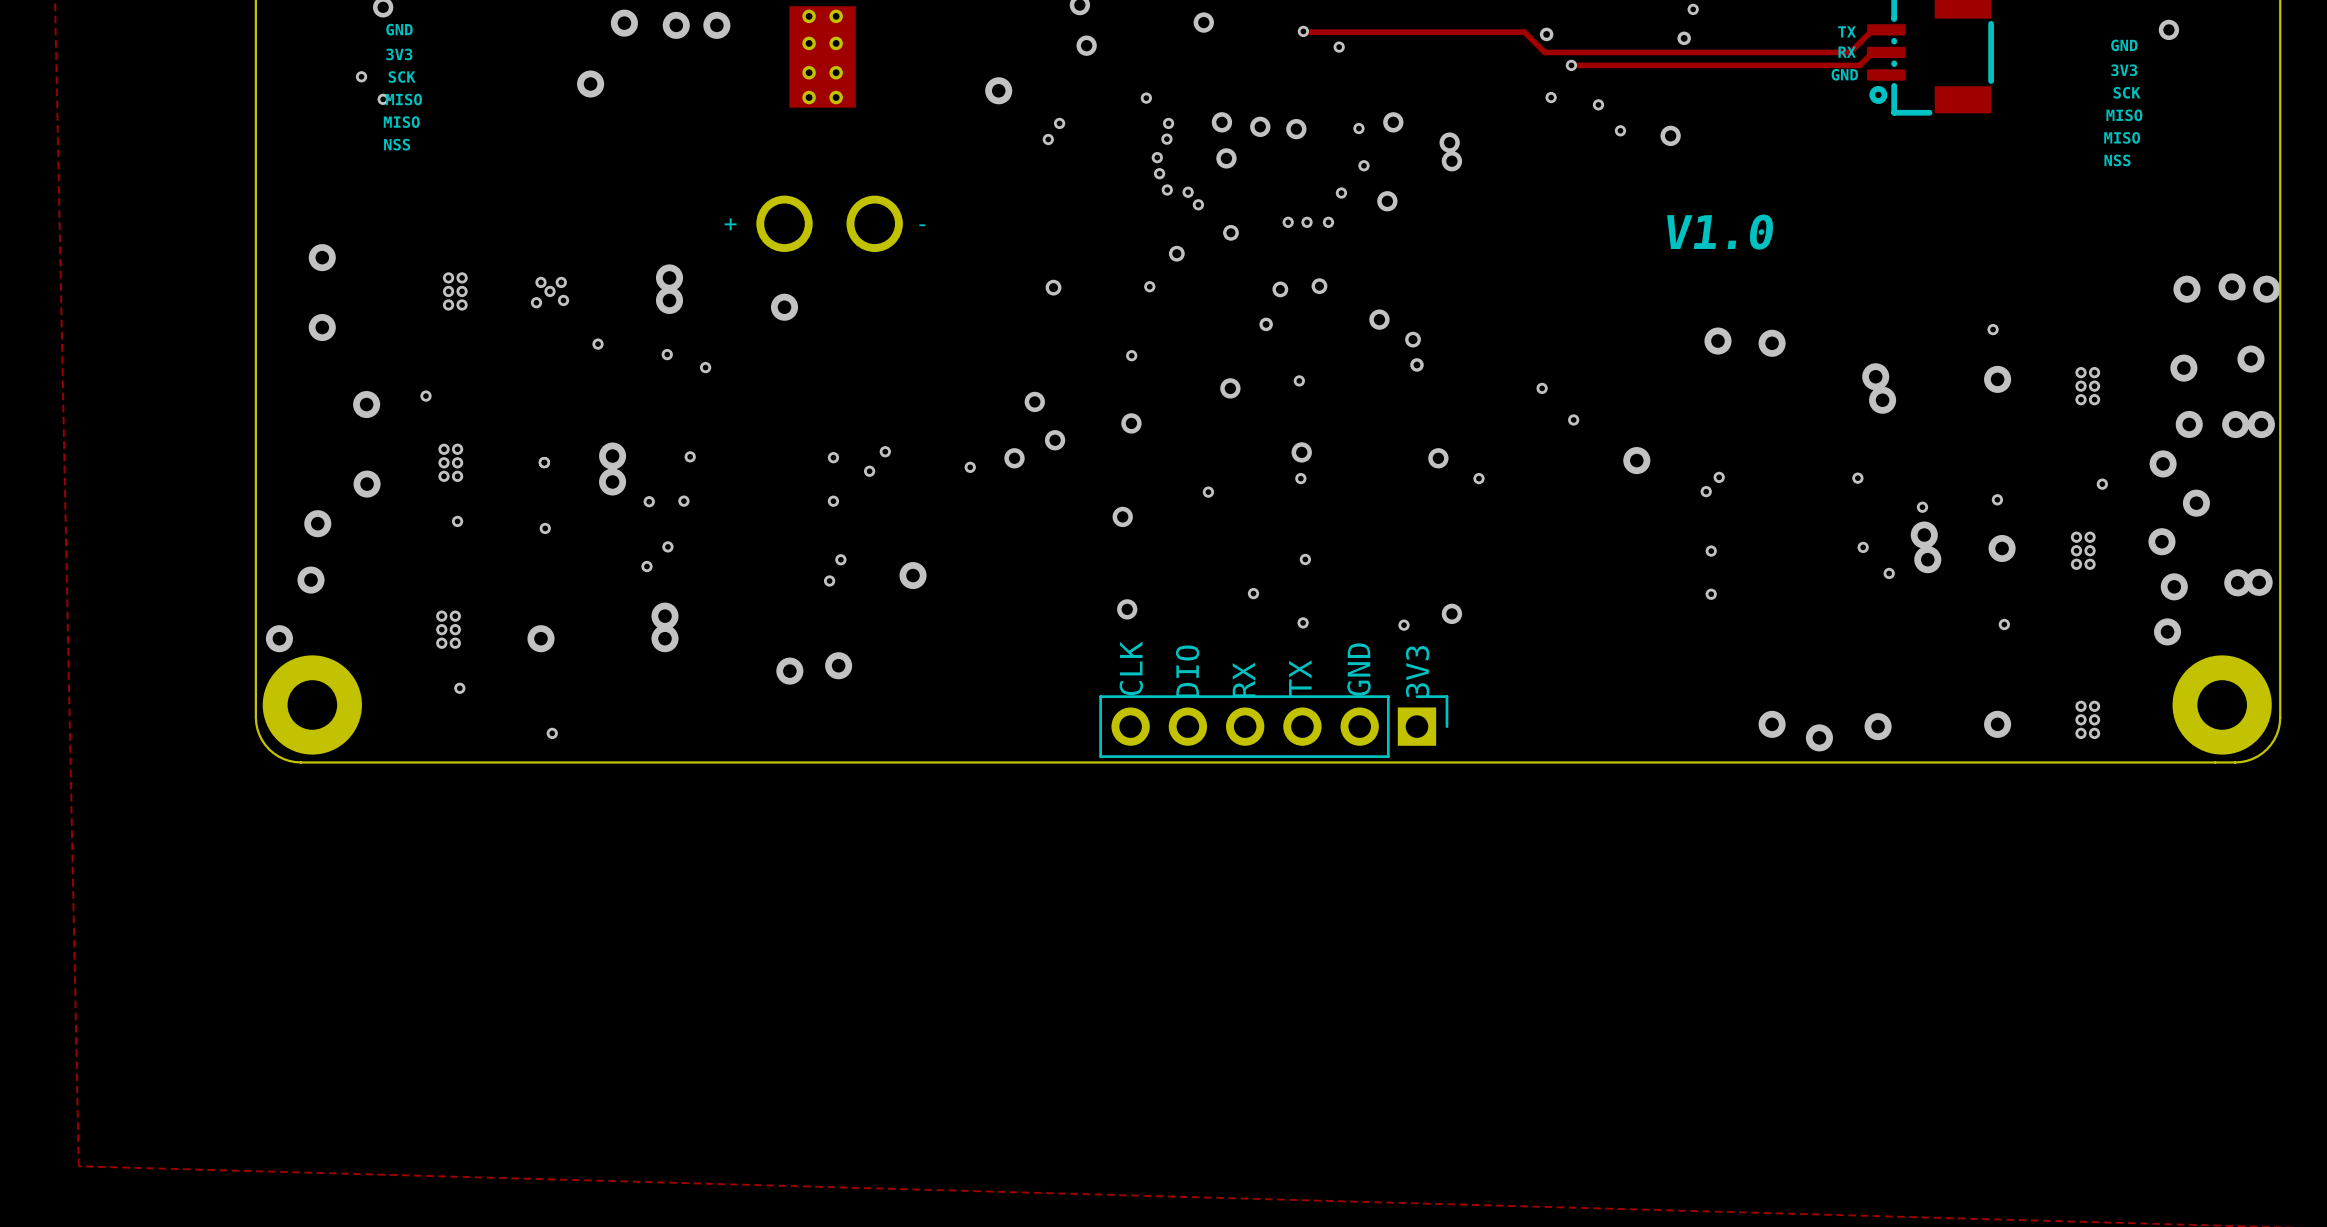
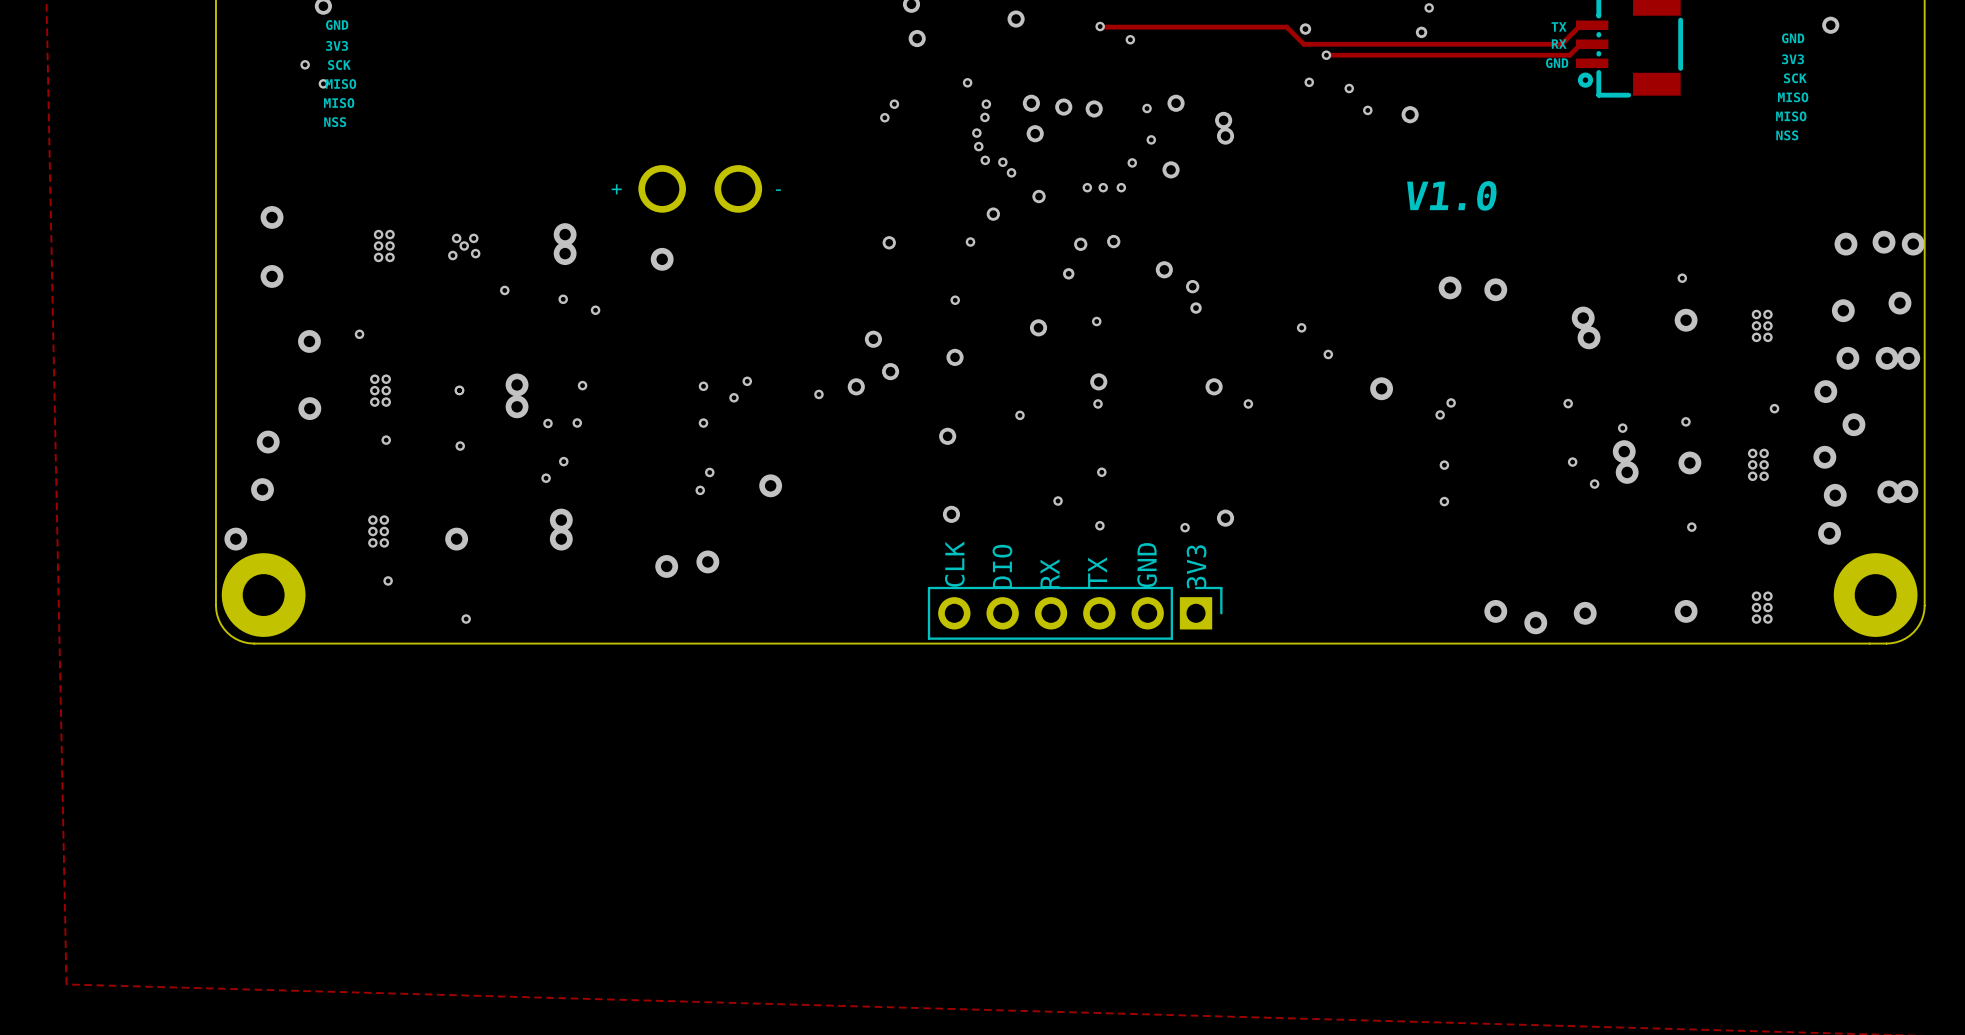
via: (624, 23) -> none
via: (676, 25) -> none
via: (716, 25) -> none
part: (822, 56) -> none
via: (590, 84) -> none
via: (998, 90) -> none

